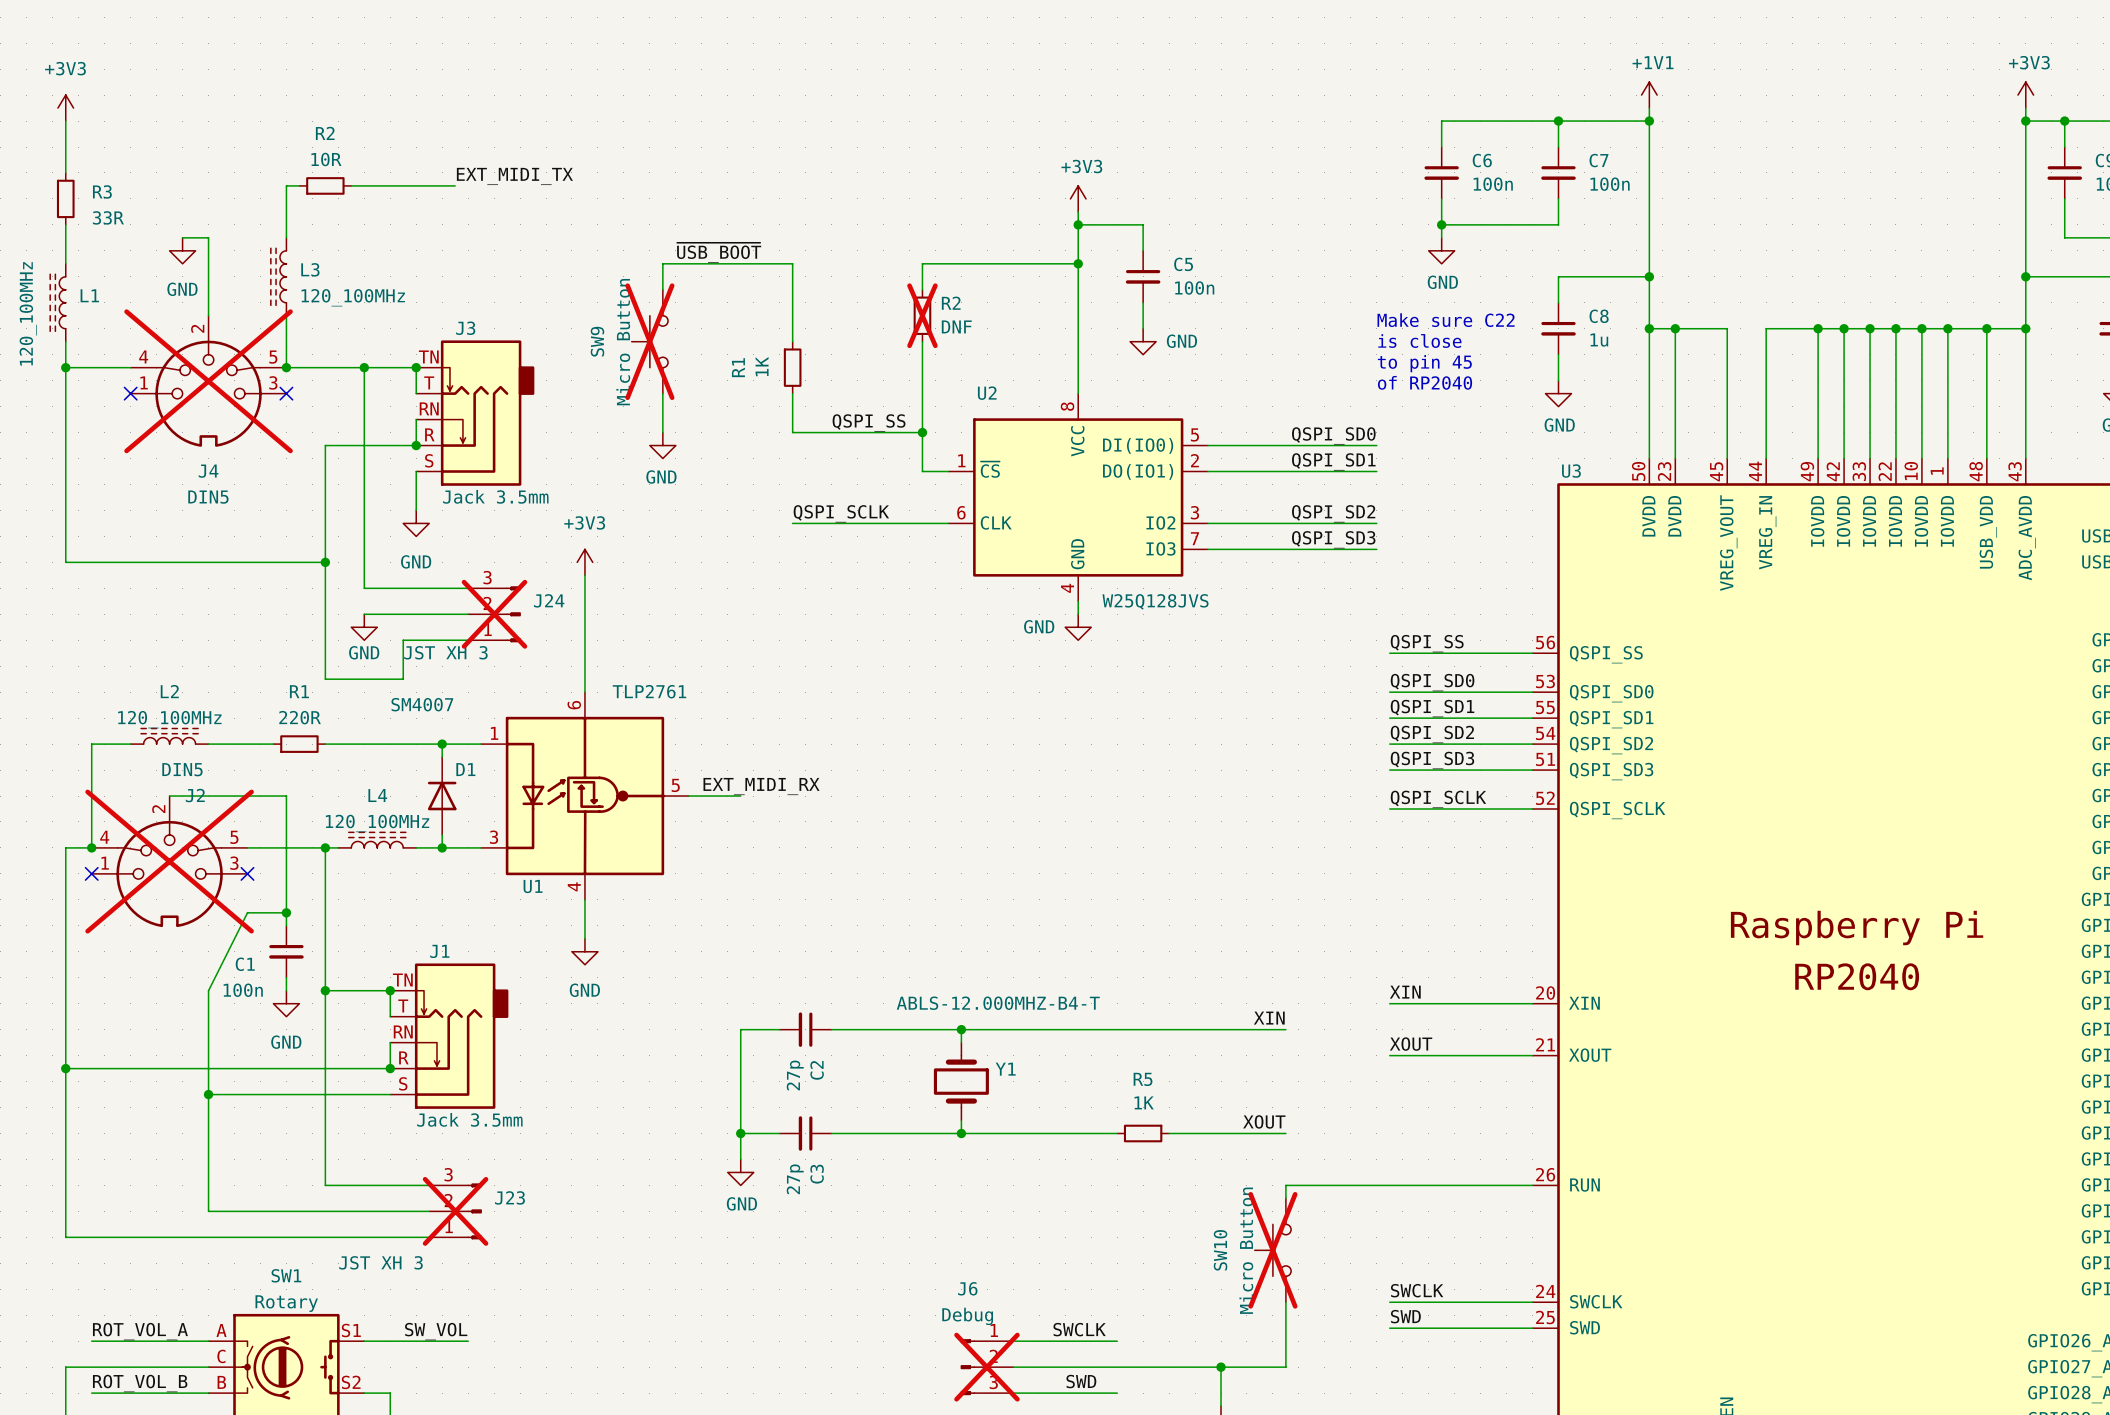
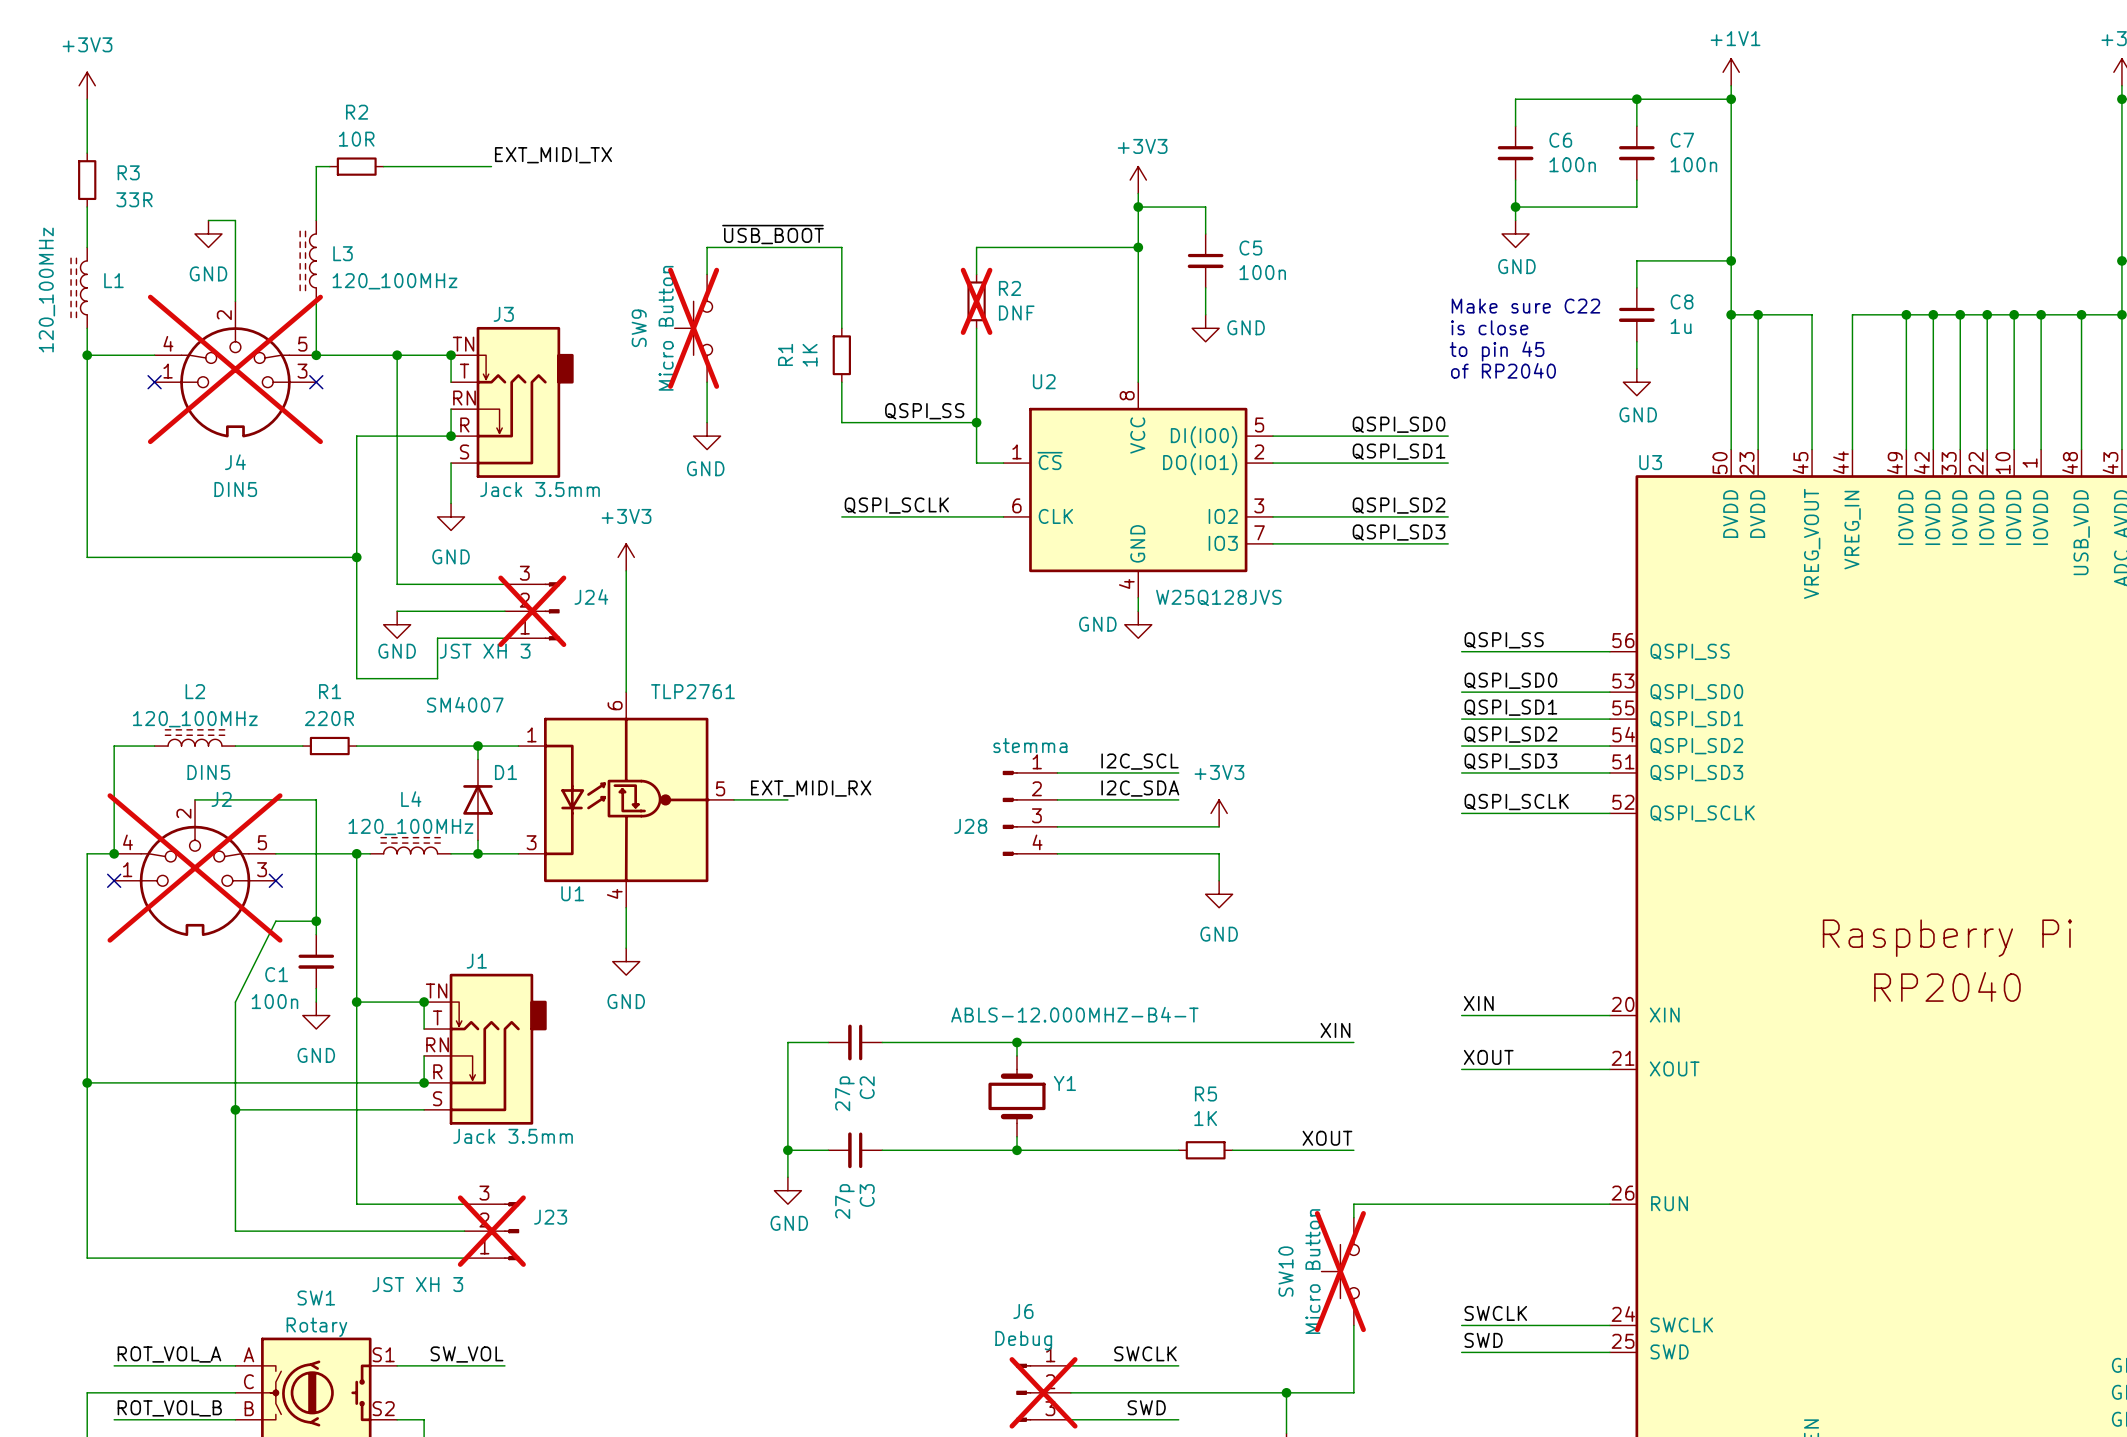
label: none -> I2C_SCL (1139, 761)
wire: none -> (1057, 772) (1178, 772)
label: none -> I2C_SDA (1140, 788)
wire: none -> (1057, 799) (1178, 799)
J28: none -> stemma (1030, 813)
power symbol: none -> +3V3 (1219, 813)
wire: none -> (1057, 826) (1219, 826)
wire: none -> (1057, 853) (1219, 853) (1219, 880)
power symbol: none -> GND (1219, 894)

